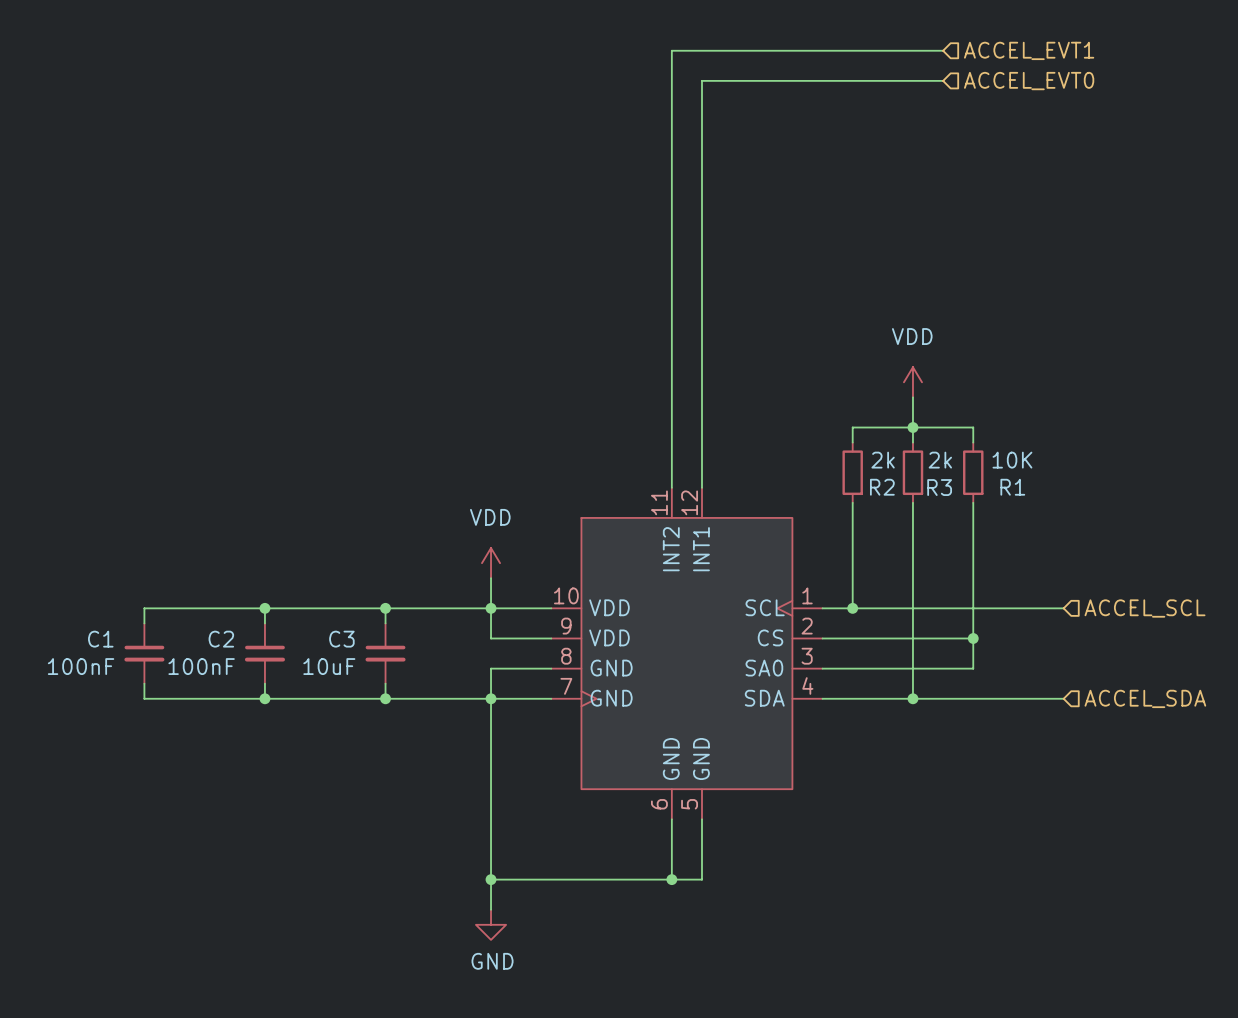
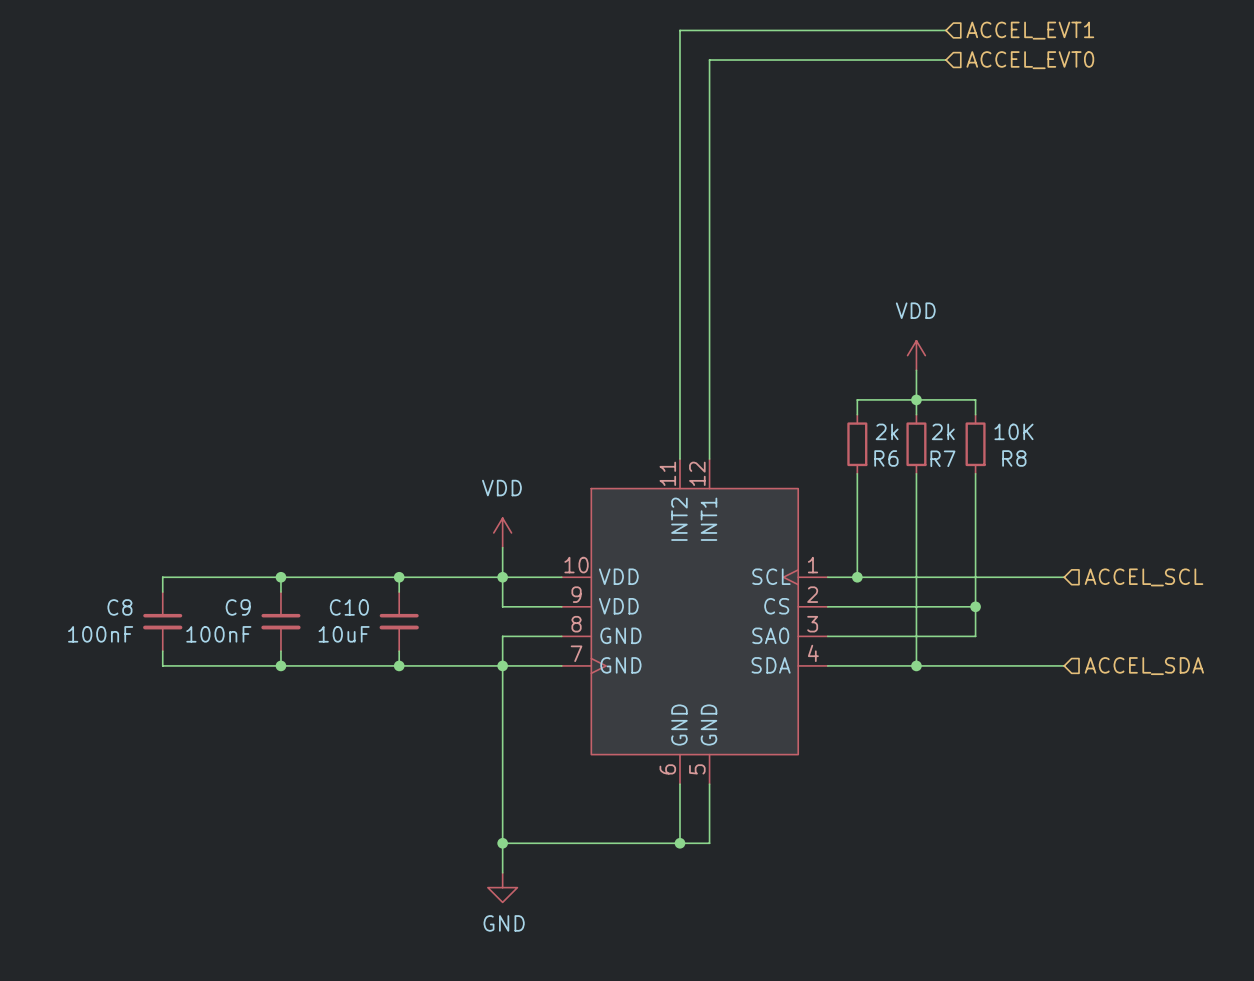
R2 name: R2 (882, 487) -> R6 (886, 458)
R3 name: R3 (939, 487) -> R7 (942, 458)
R1 name: R1 (1012, 487) -> R8 (1014, 458)
C1 name: C1 (100, 639) -> C8 (119, 607)
C2 name: C2 (221, 639) -> C9 (238, 607)
C3 name: C3 (341, 639) -> C10 (349, 607)

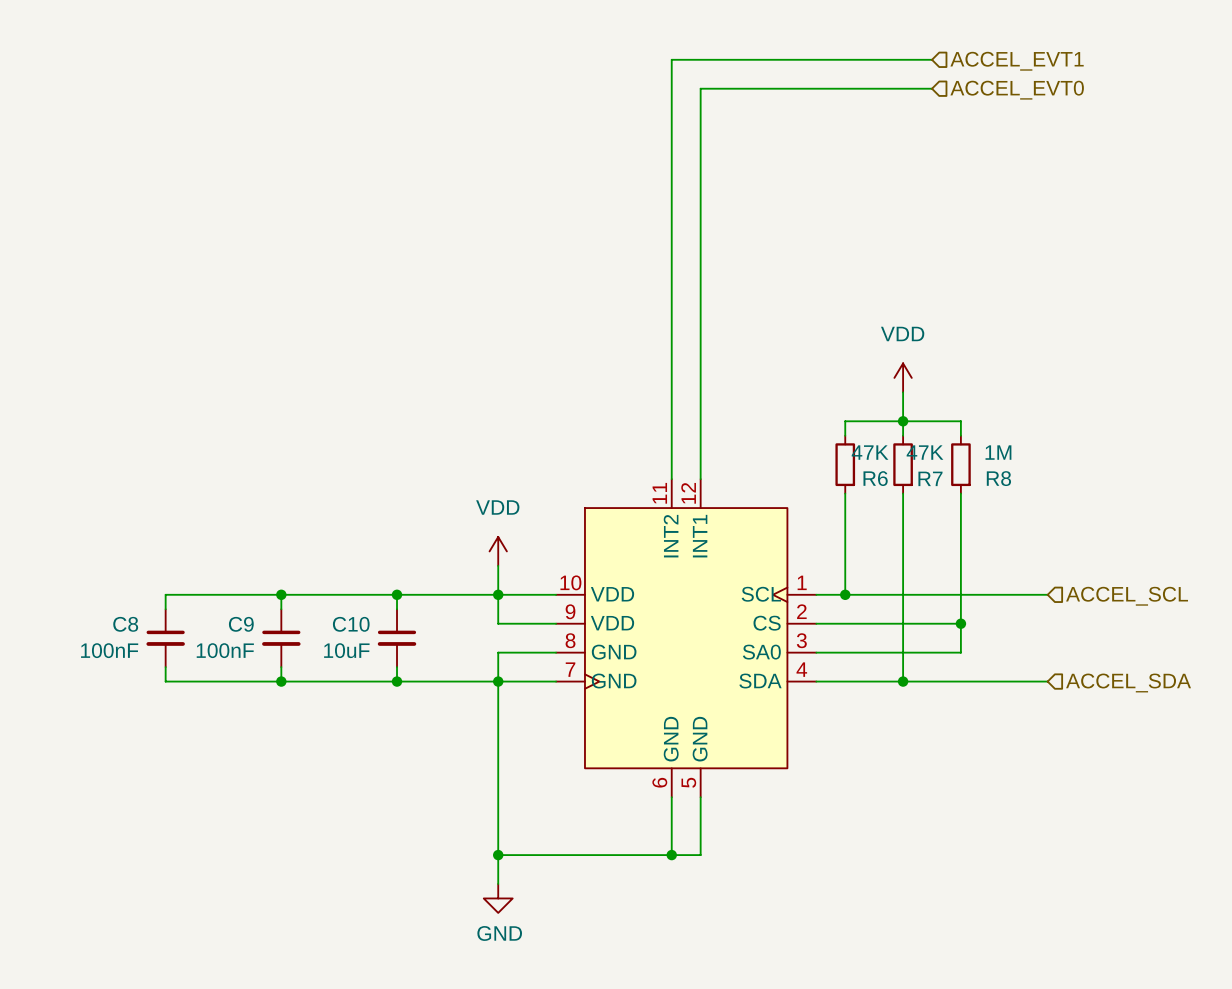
R6 value: 2k (887, 431) -> 47K (870, 452)
R7 value: 2k (943, 431) -> 47K (925, 452)
R8 value: 10K (1013, 431) -> 1M (998, 452)

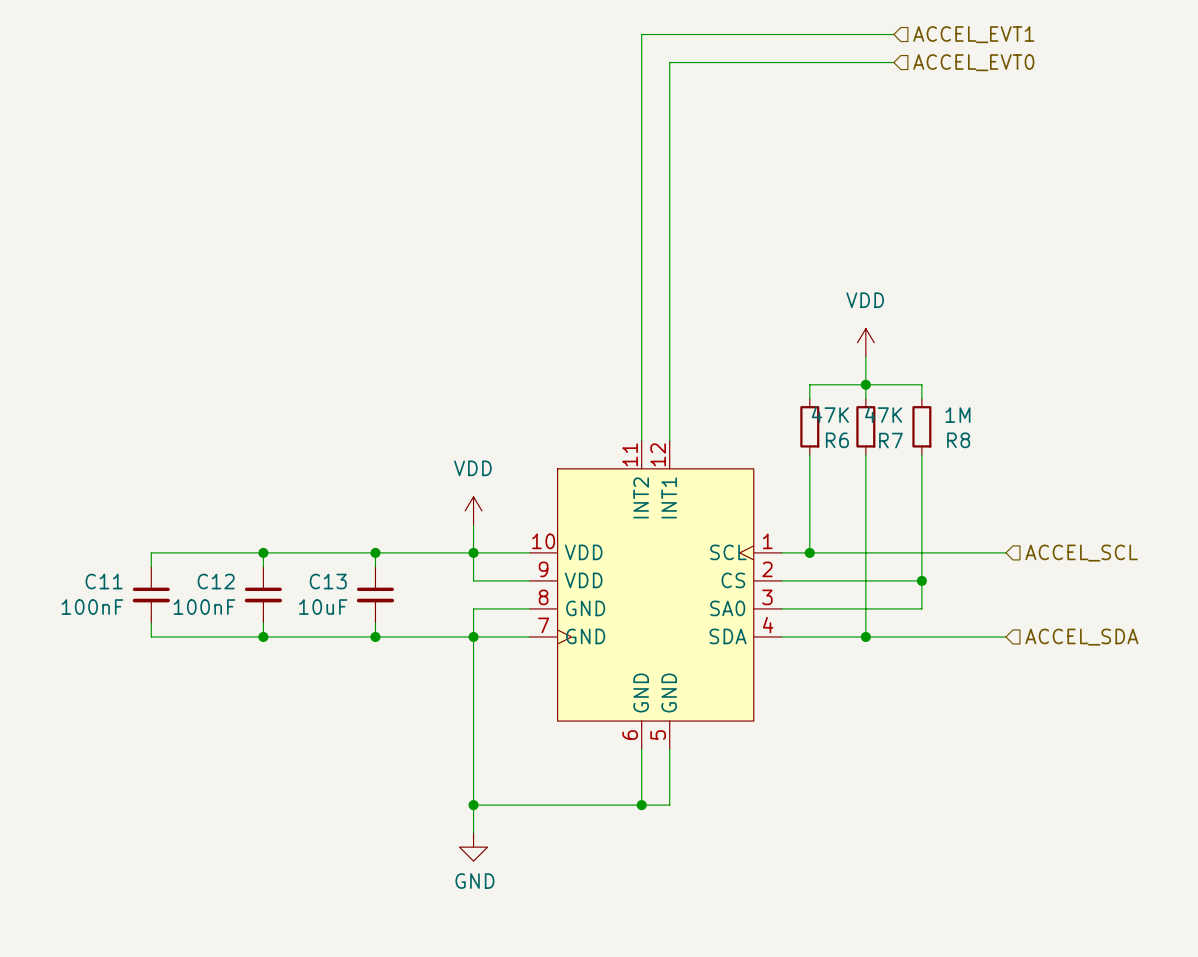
C8 name: C8 (125, 624) -> C11 (104, 581)
C9 name: C9 (241, 624) -> C12 (216, 581)
C10 name: C10 (351, 624) -> C13 (328, 581)

